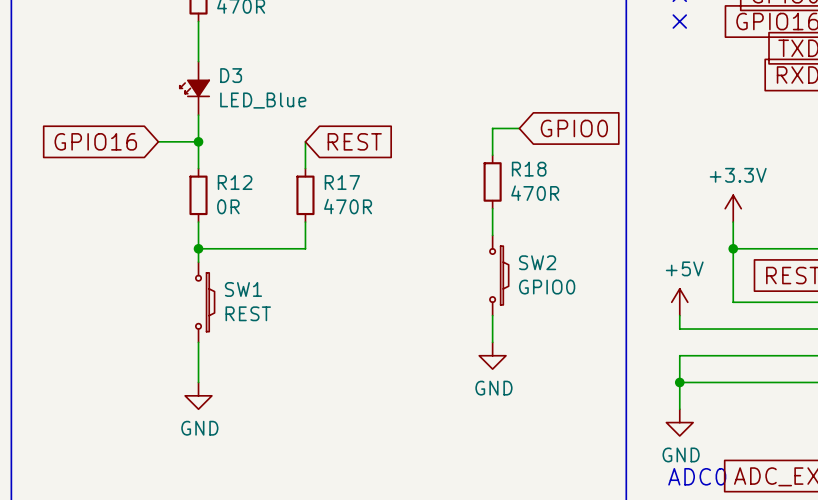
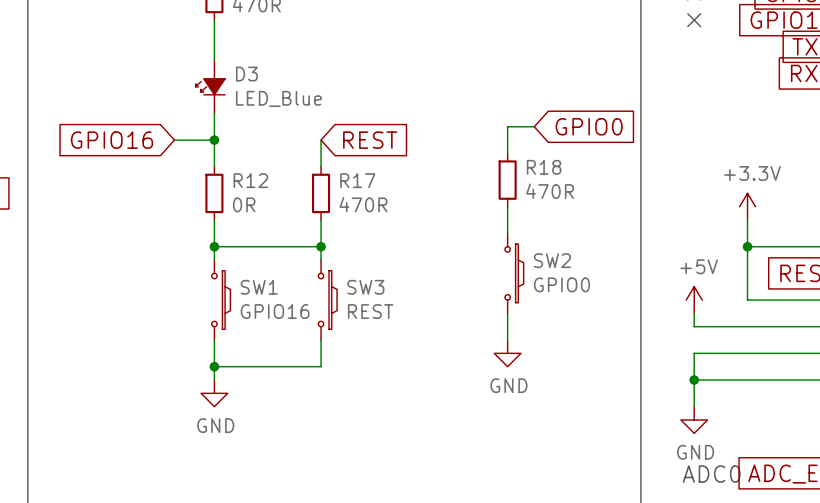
wire: none -> (321, 246) (321, 260)
junction: none -> (321, 246)
SW3: none -> REST (327, 300)
SW1 value: REST (248, 313) -> GPIO16 (275, 311)
wire: none -> (321, 340) (321, 366) (214, 366)
junction: none -> (214, 366)

